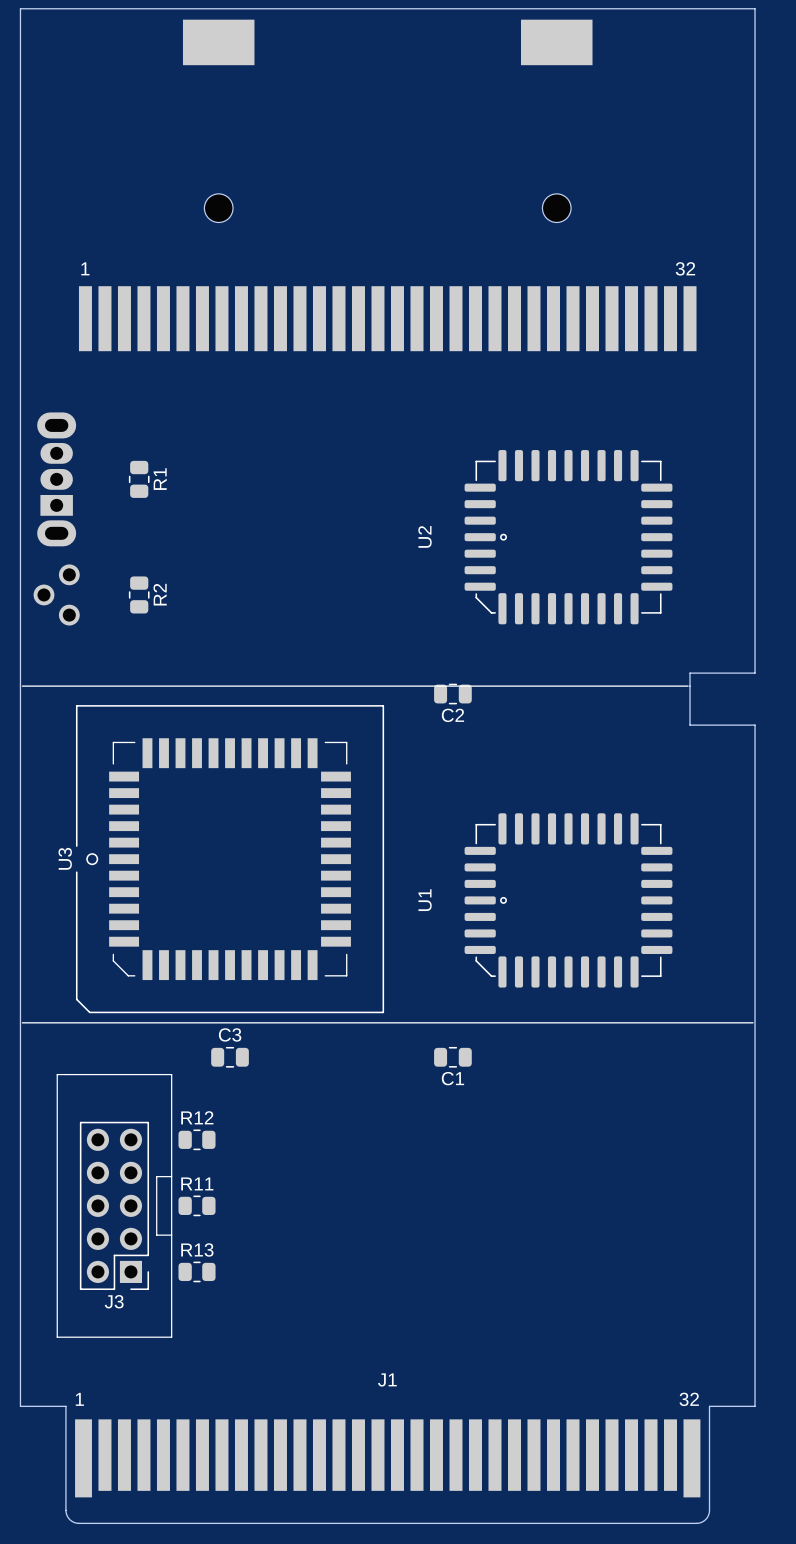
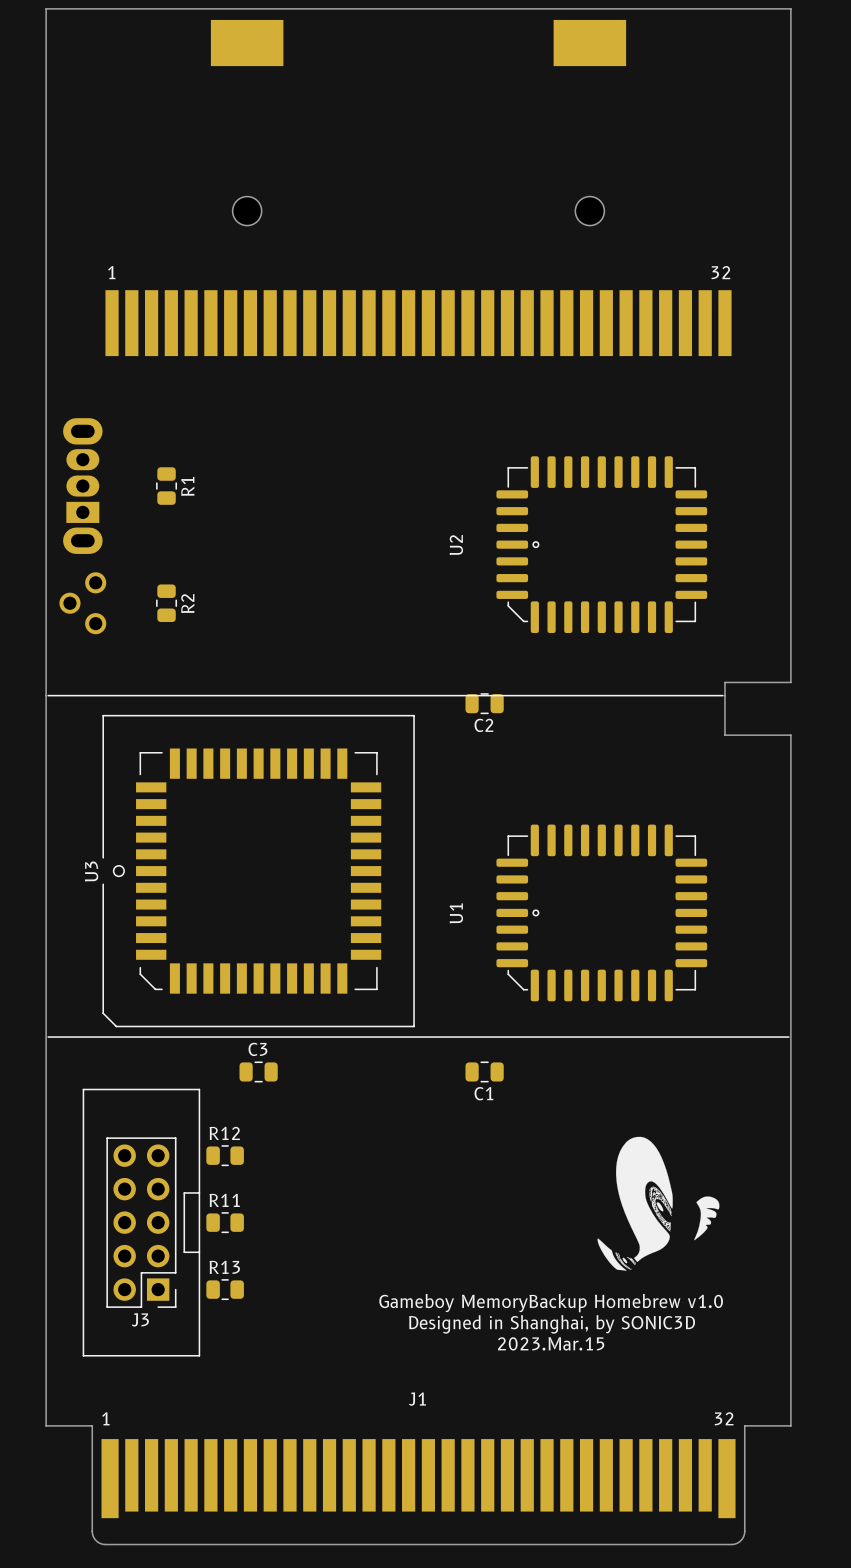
drawing: none -> [597, 1136, 720, 1271]
text: none -> Gameboy MemoryBackup Homebrew v1.0 (551, 1303)
text: none -> Designed in Shanghai, by SONIC3D (552, 1324)
text: none -> 2023.Mar.15 (551, 1343)

